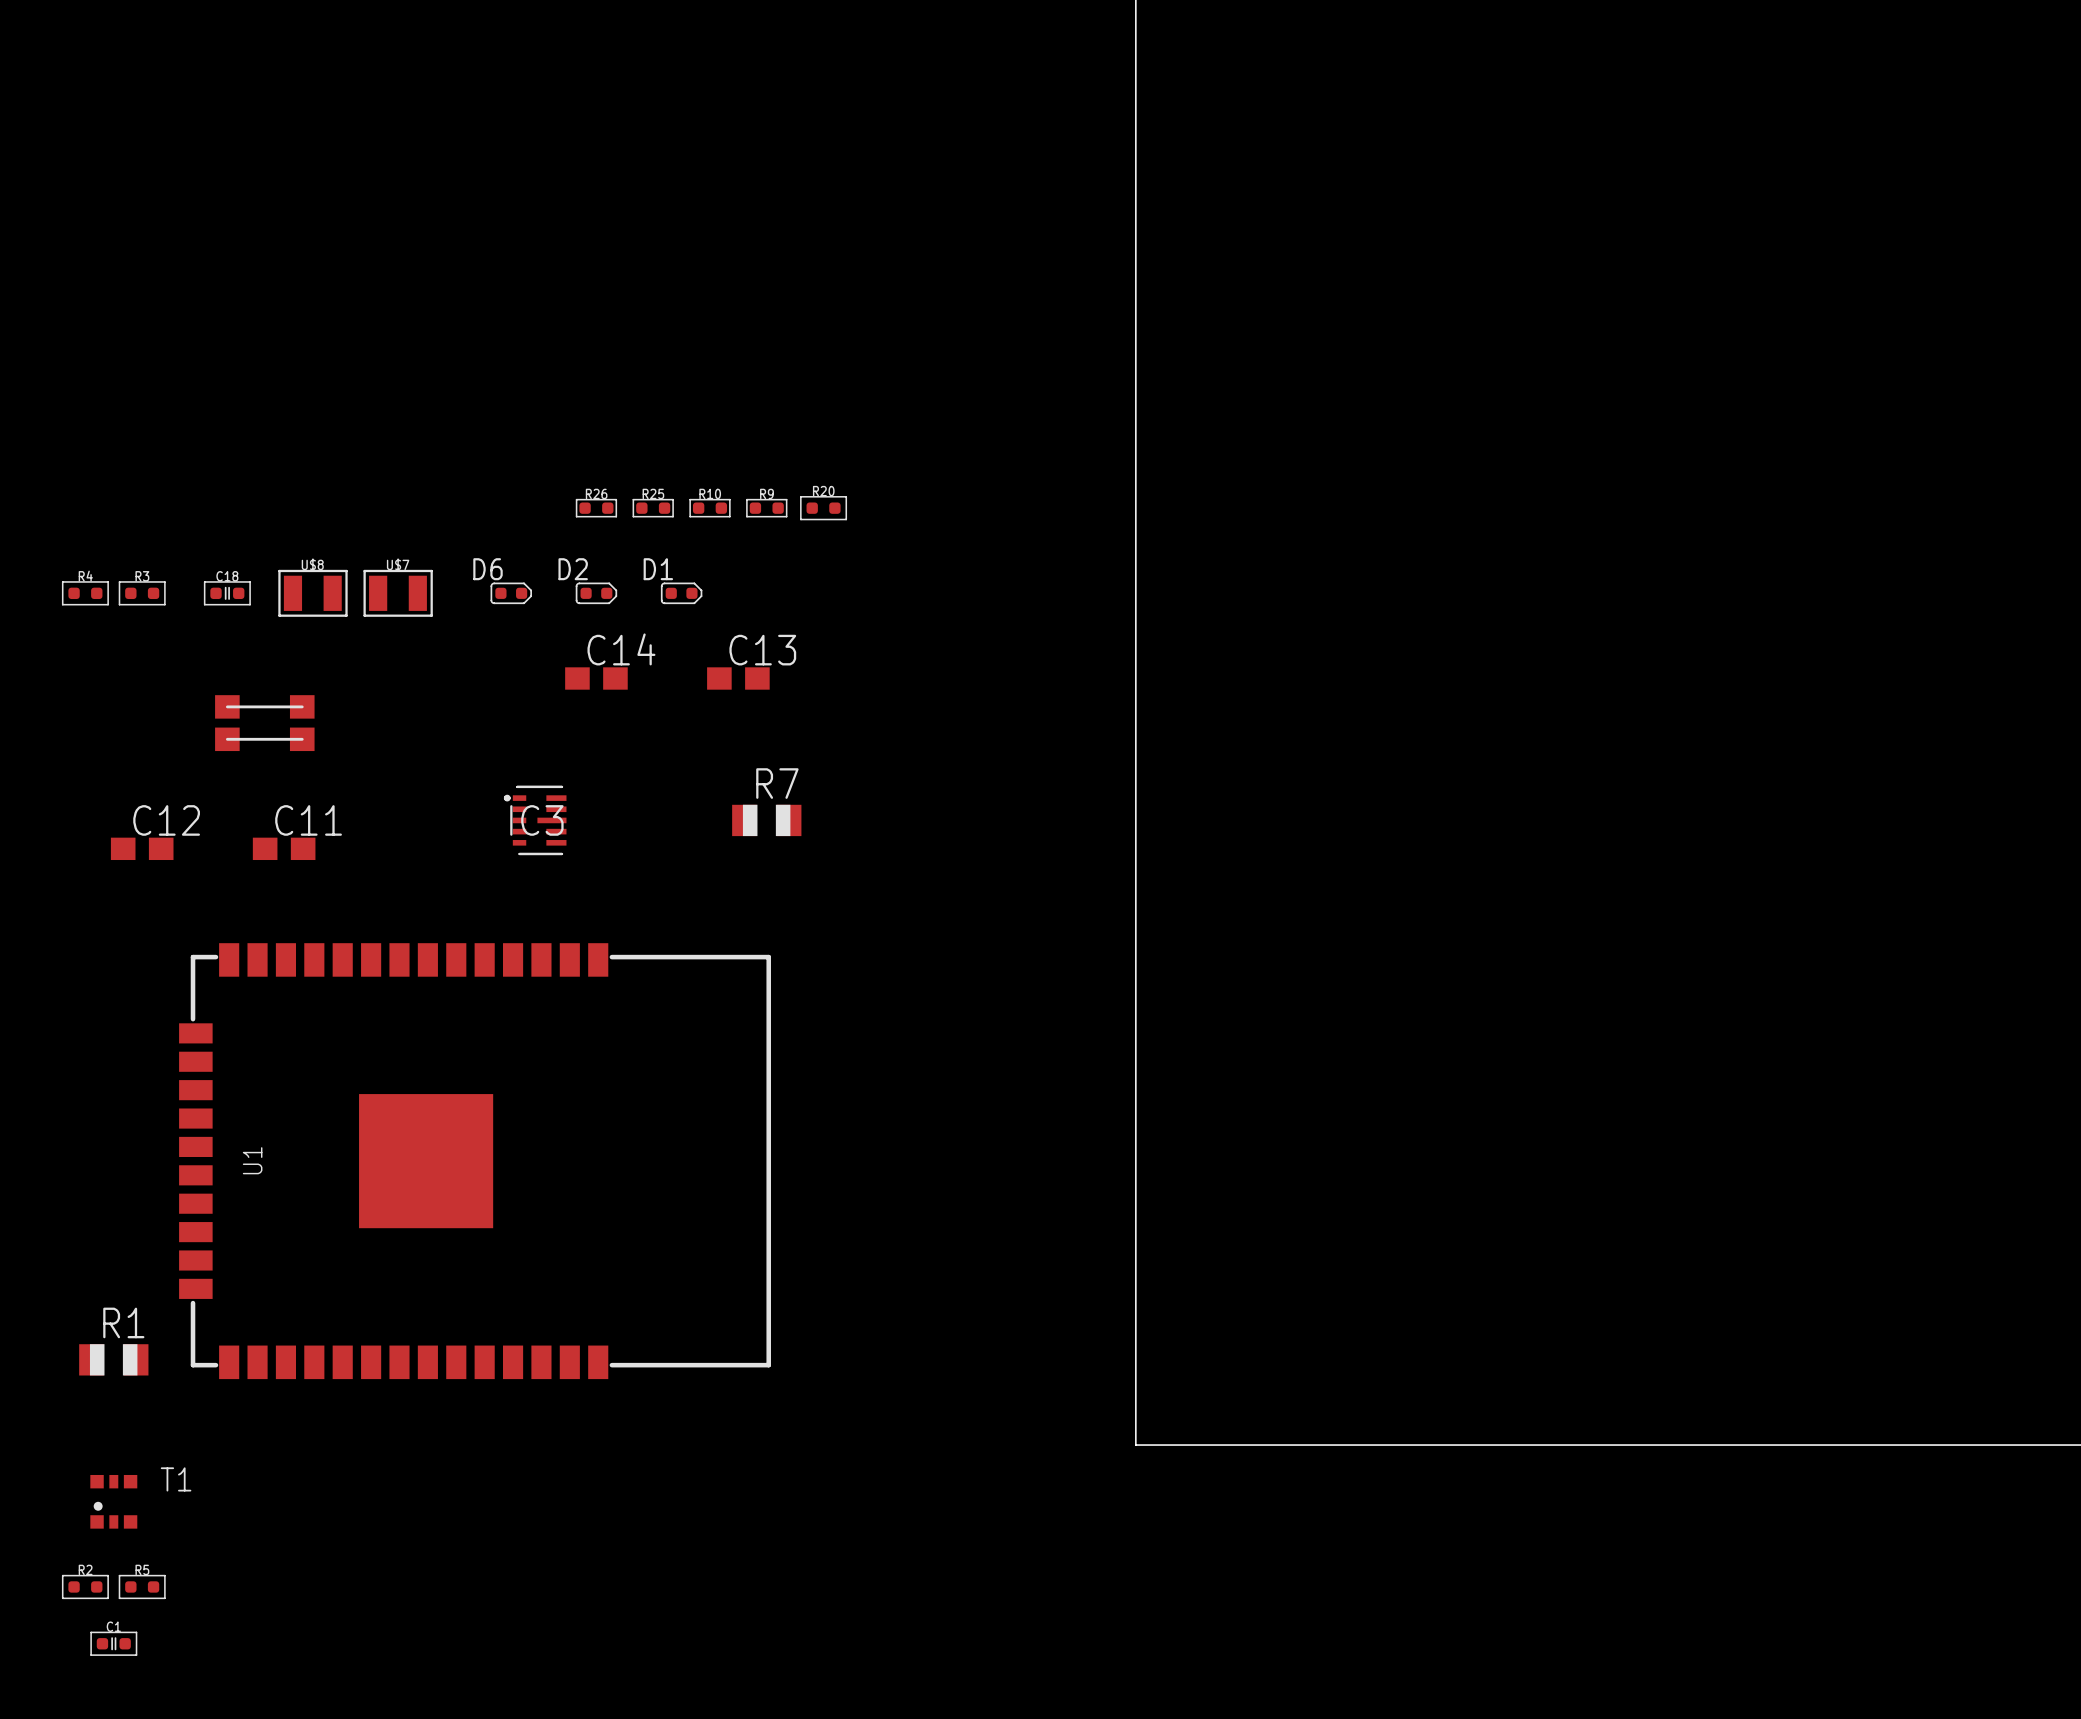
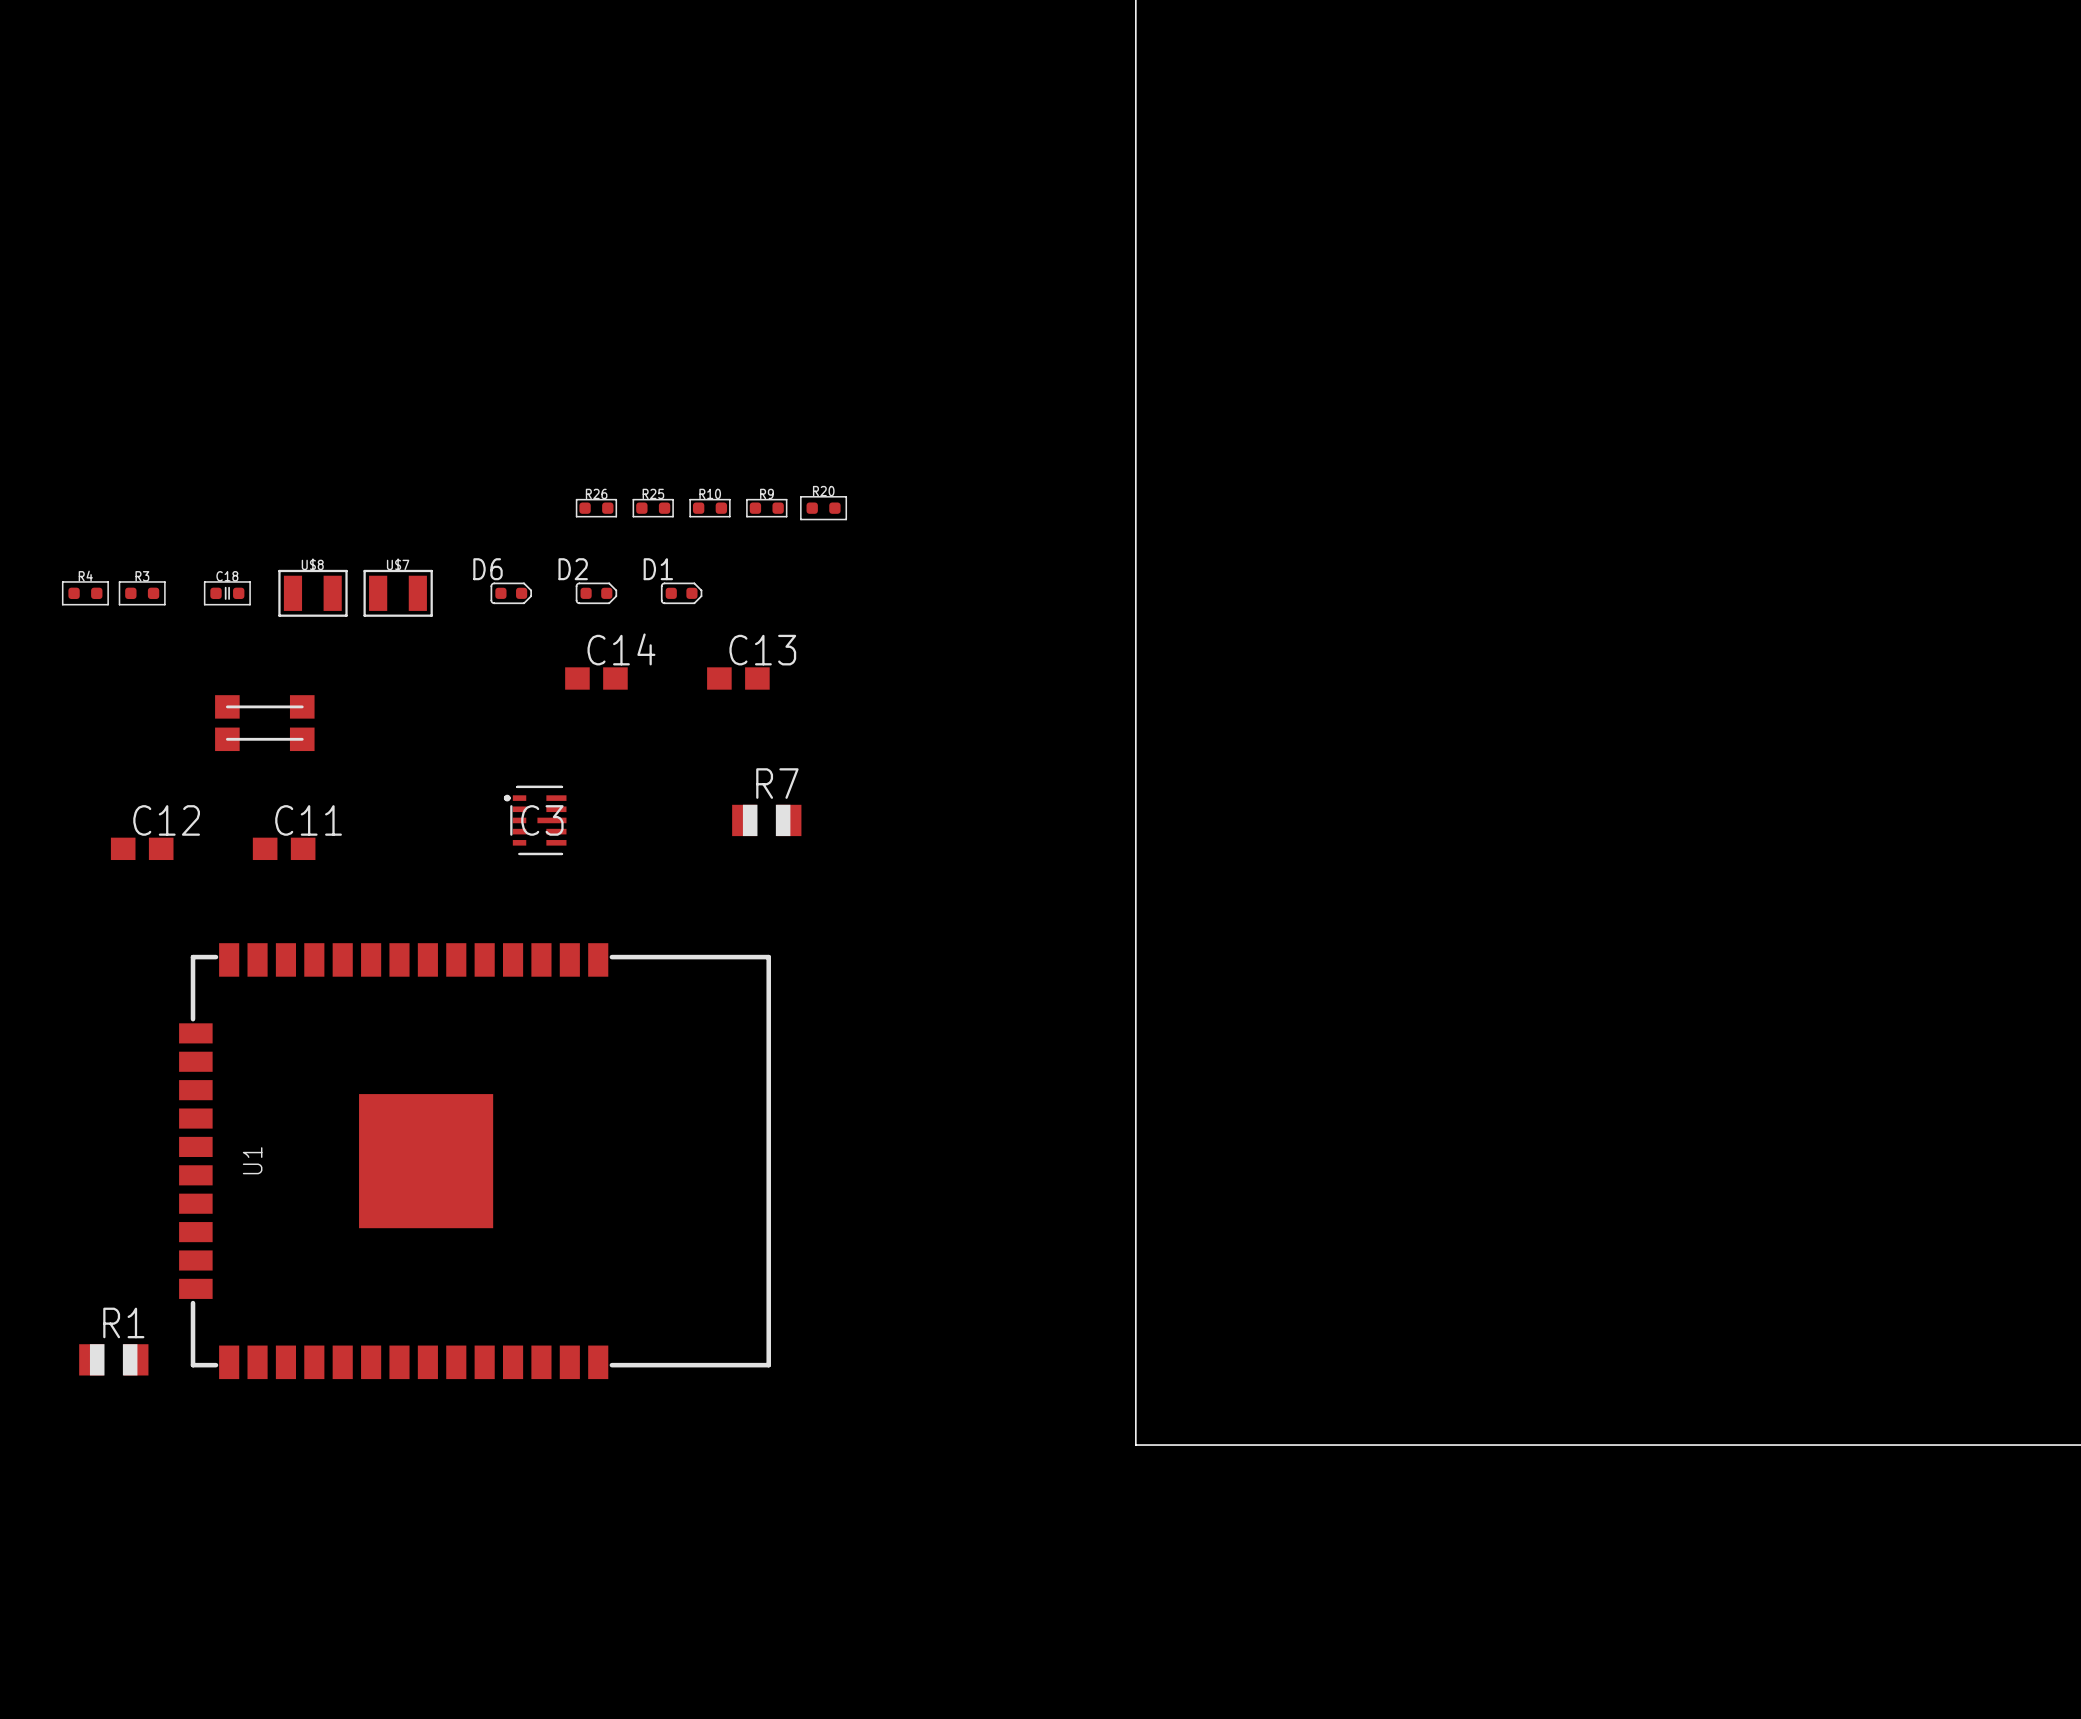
T1: (113, 1501) -> none
R2: (85, 1586) -> none
R5: (142, 1586) -> none
C1: (113, 1643) -> none

